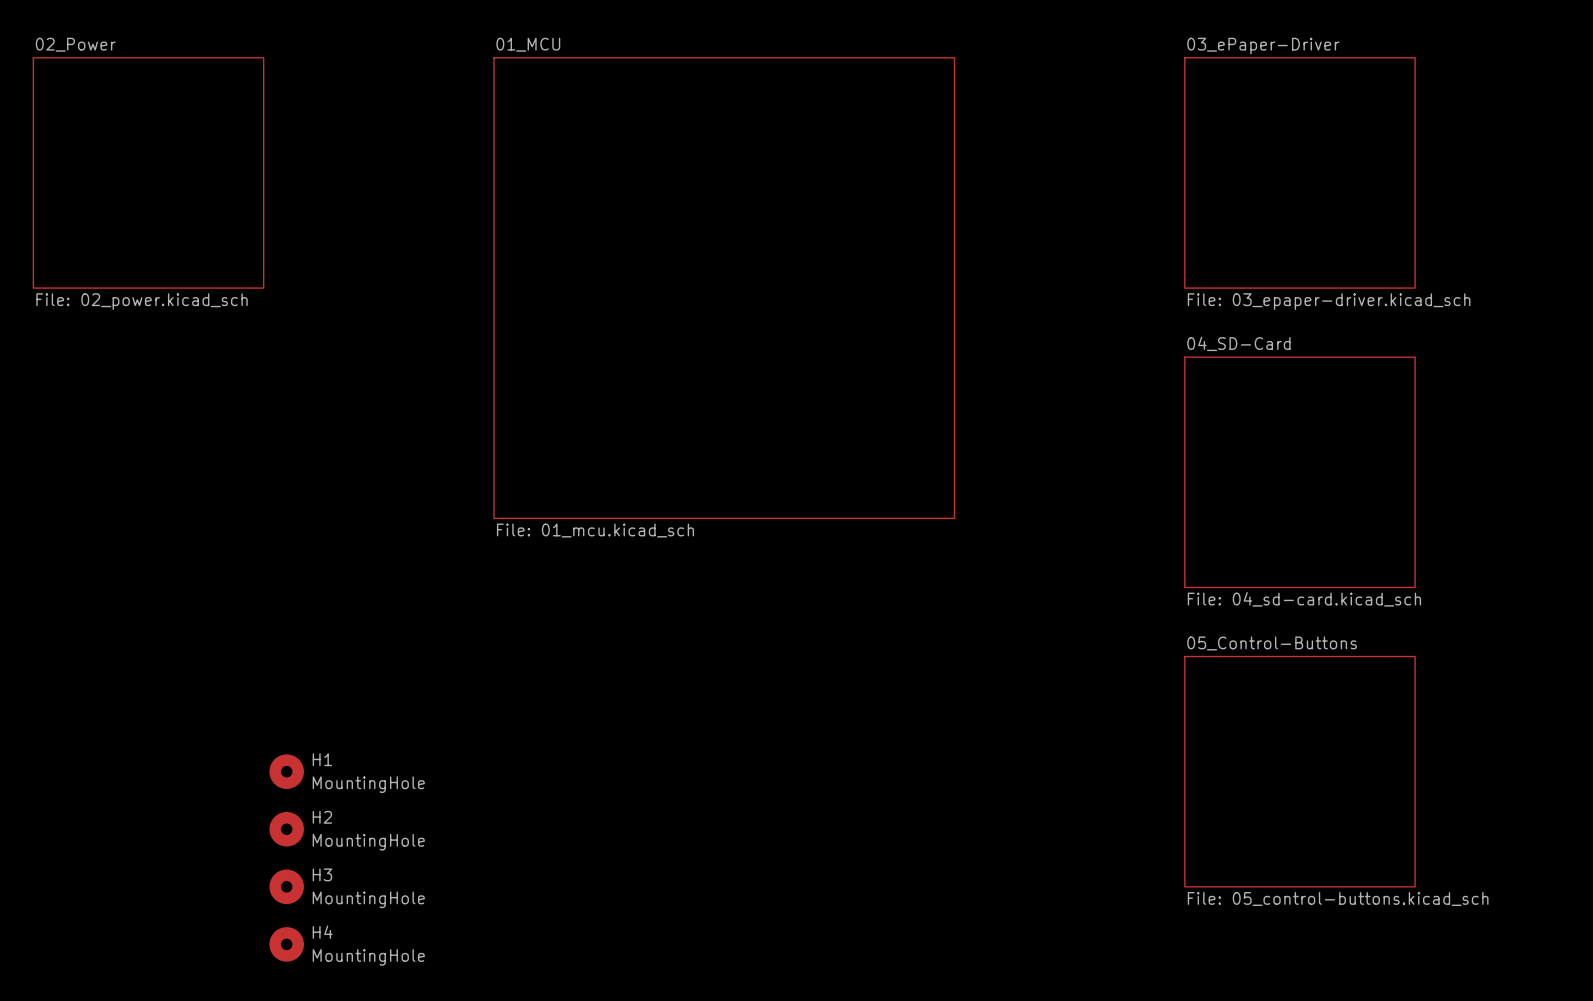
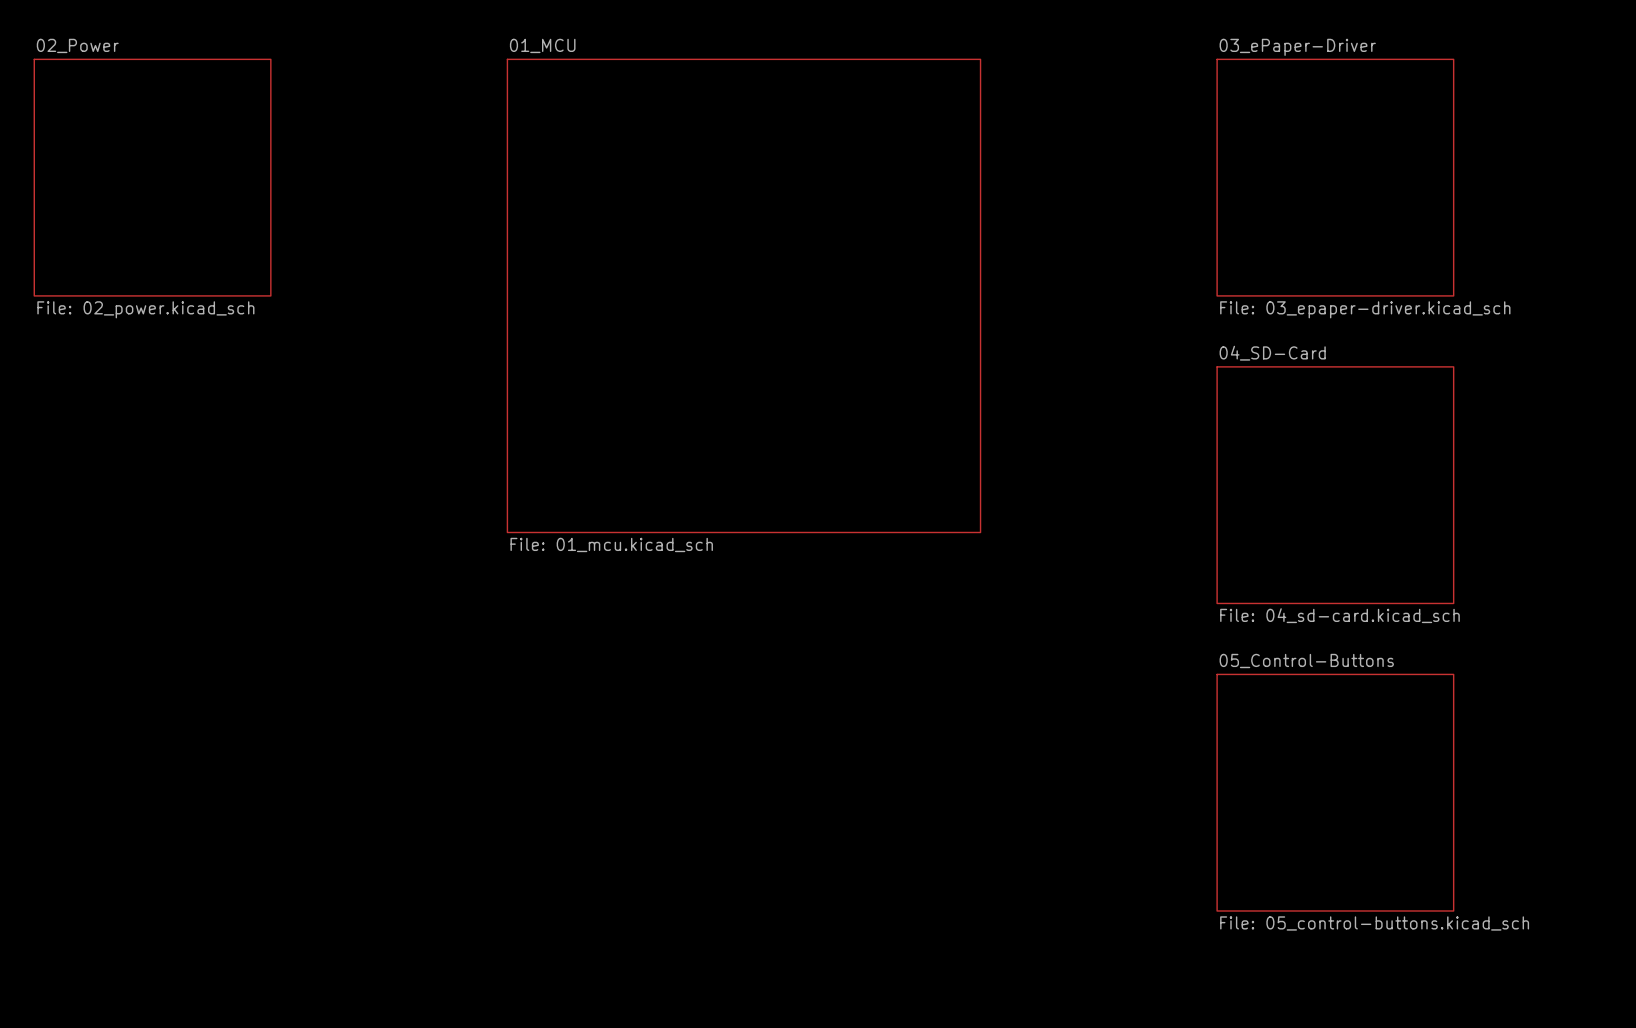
H1: MountingHole (286, 771) -> none
H2: MountingHole (286, 829) -> none
H3: MountingHole (286, 886) -> none
H4: MountingHole (286, 944) -> none

